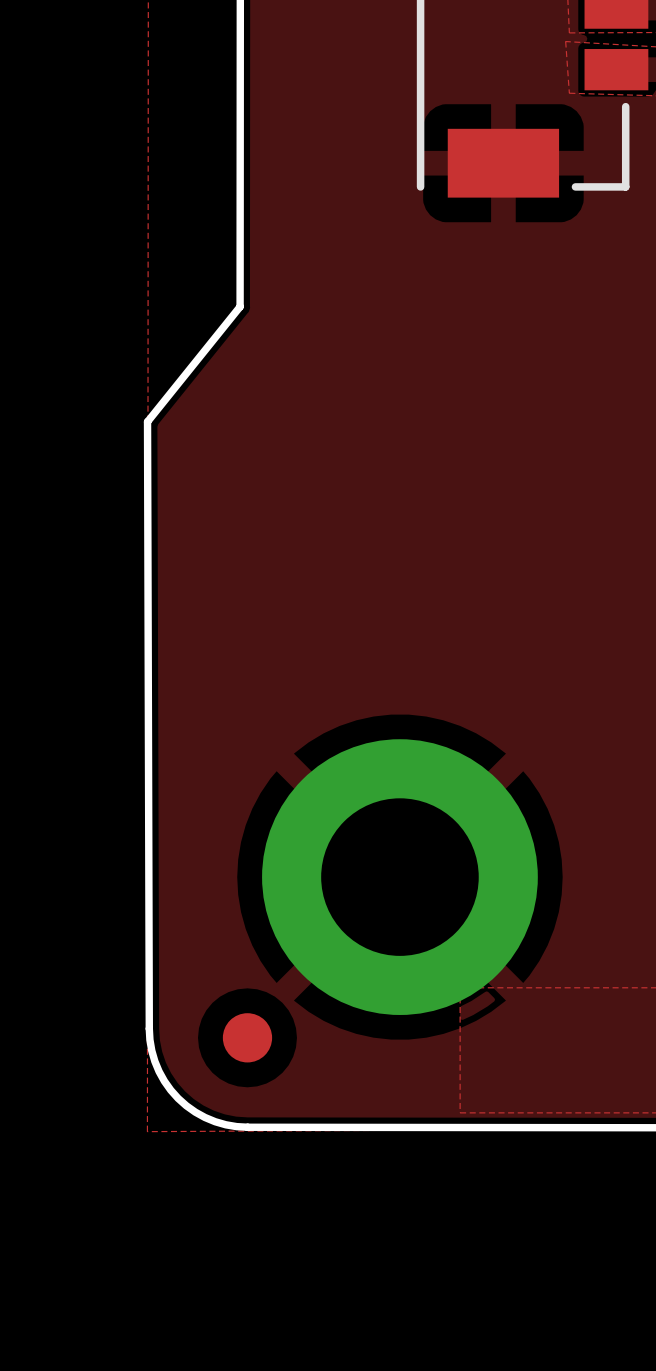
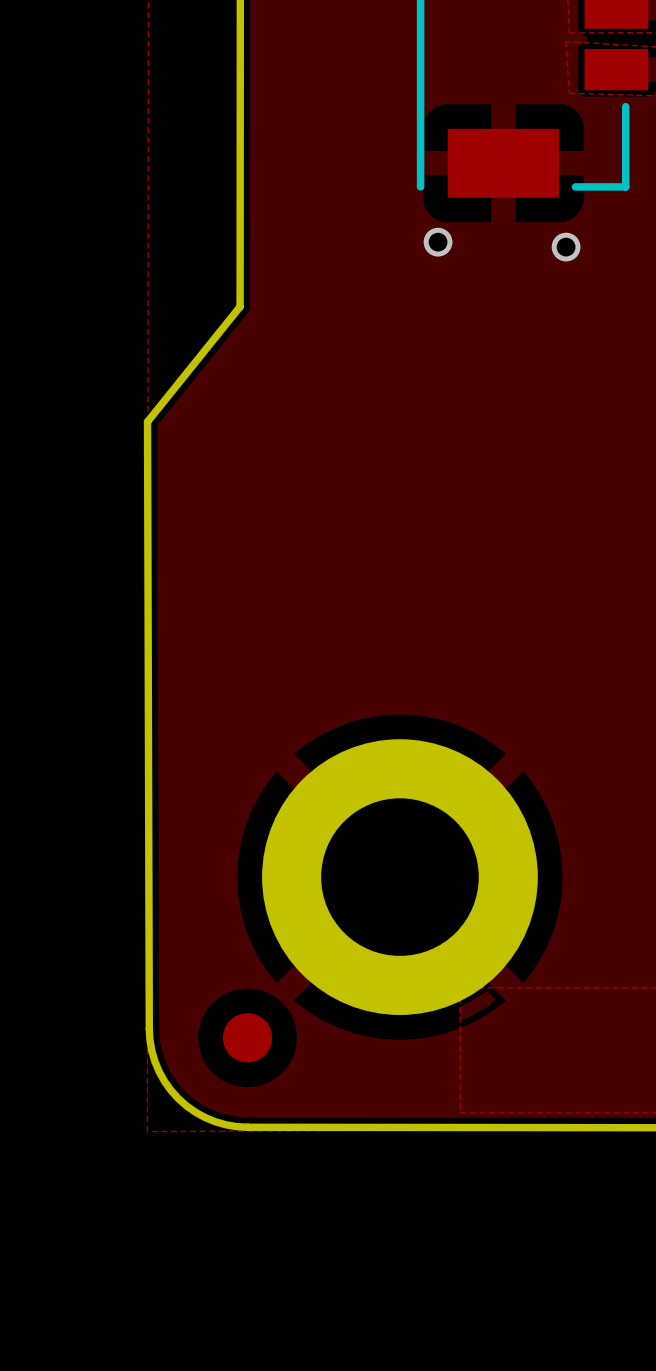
via: none -> (438, 242)
via: none -> (566, 247)

